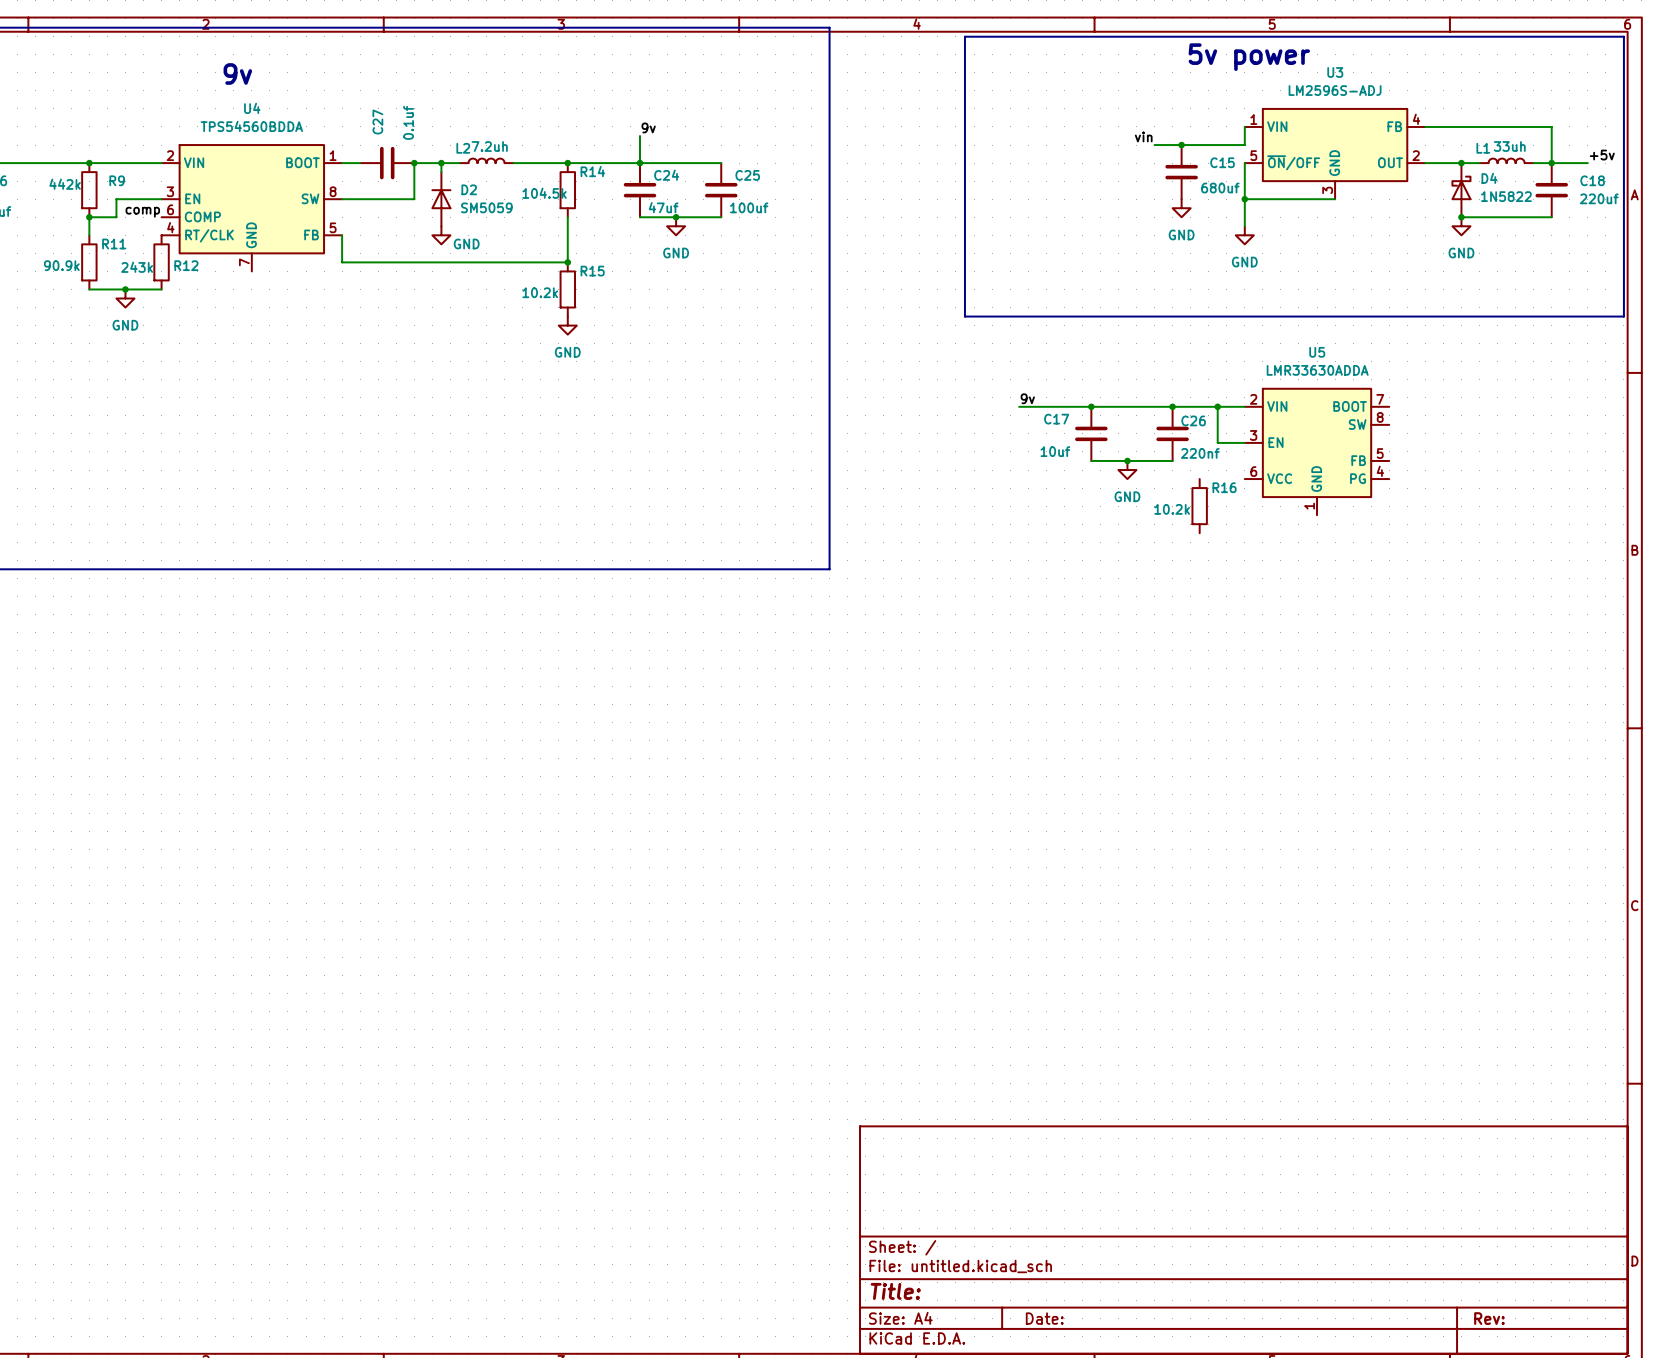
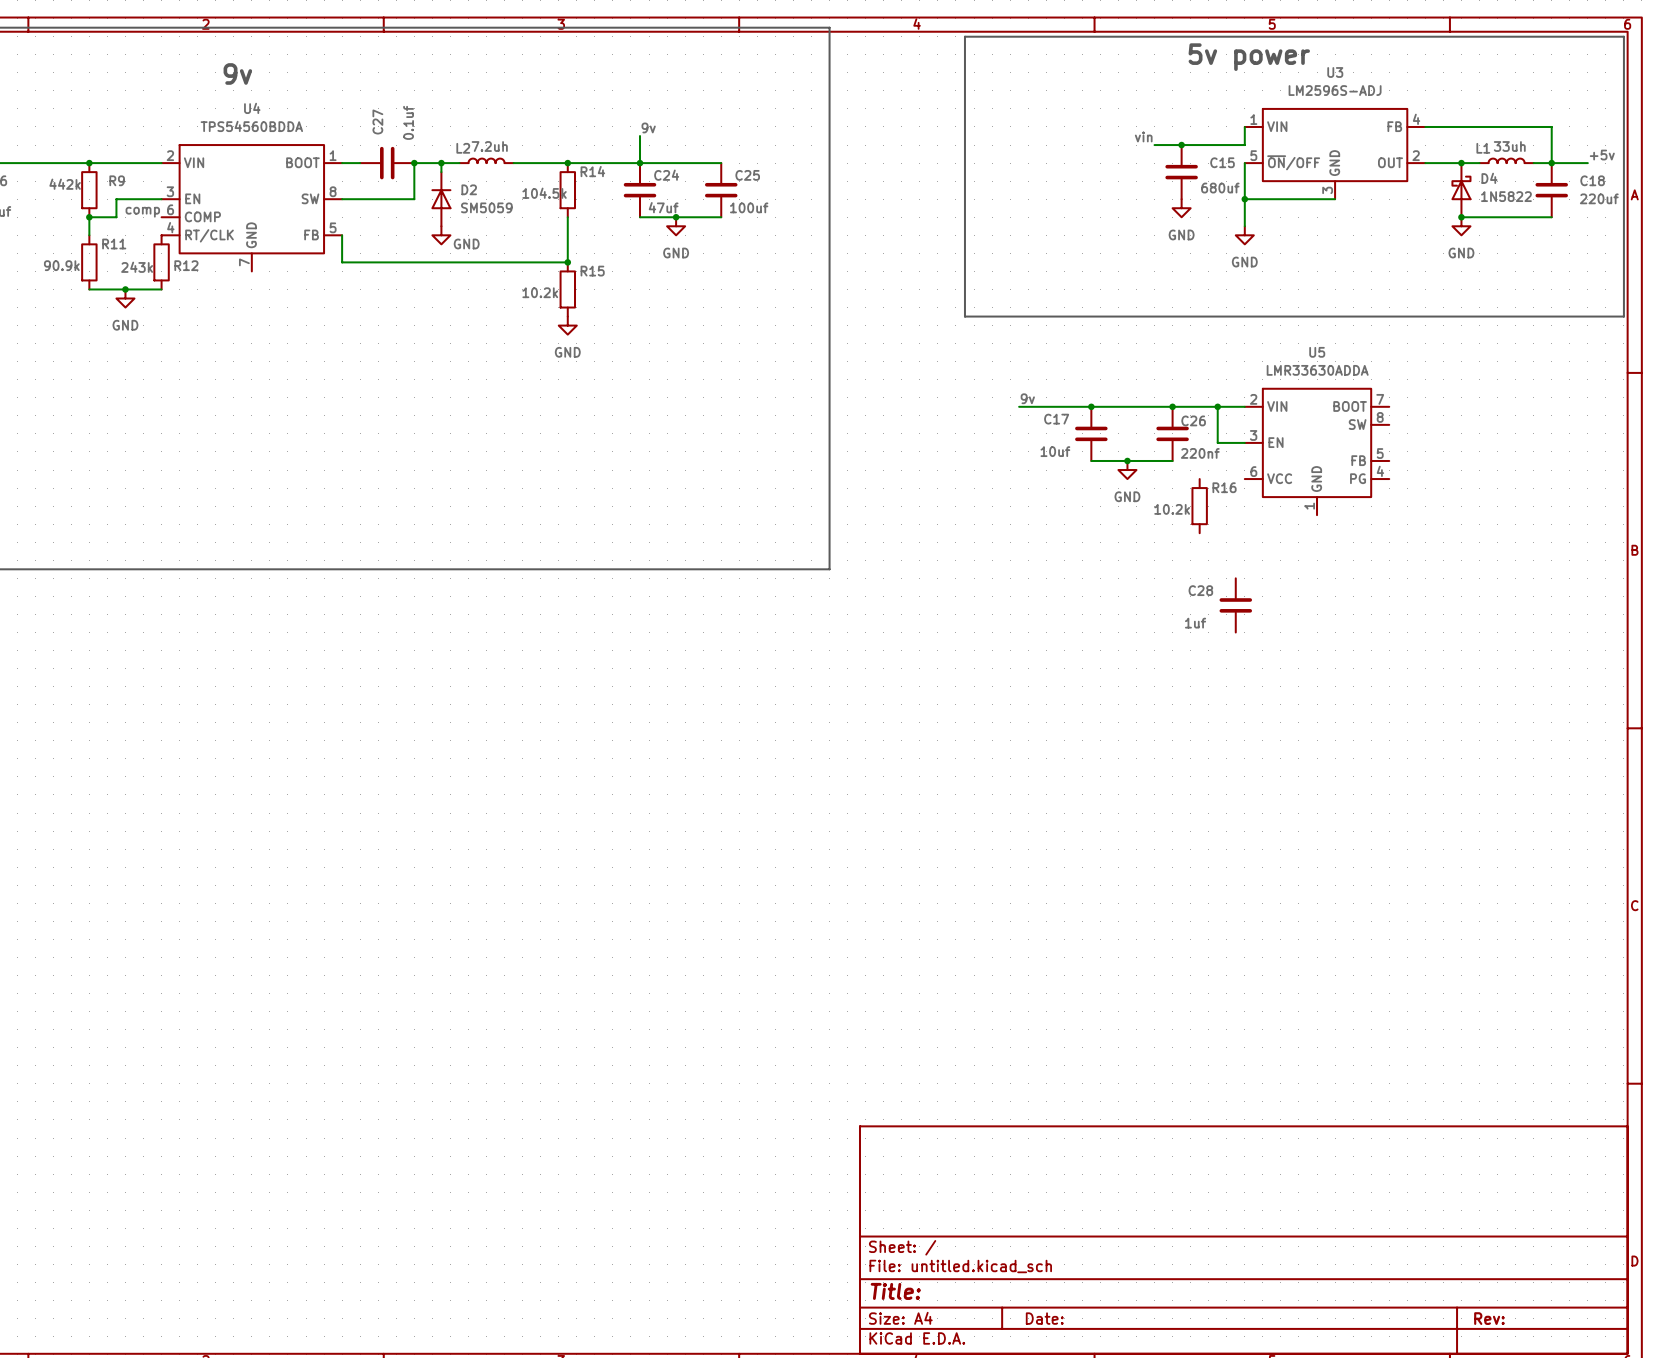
C28: none -> 1uf (1235, 605)

